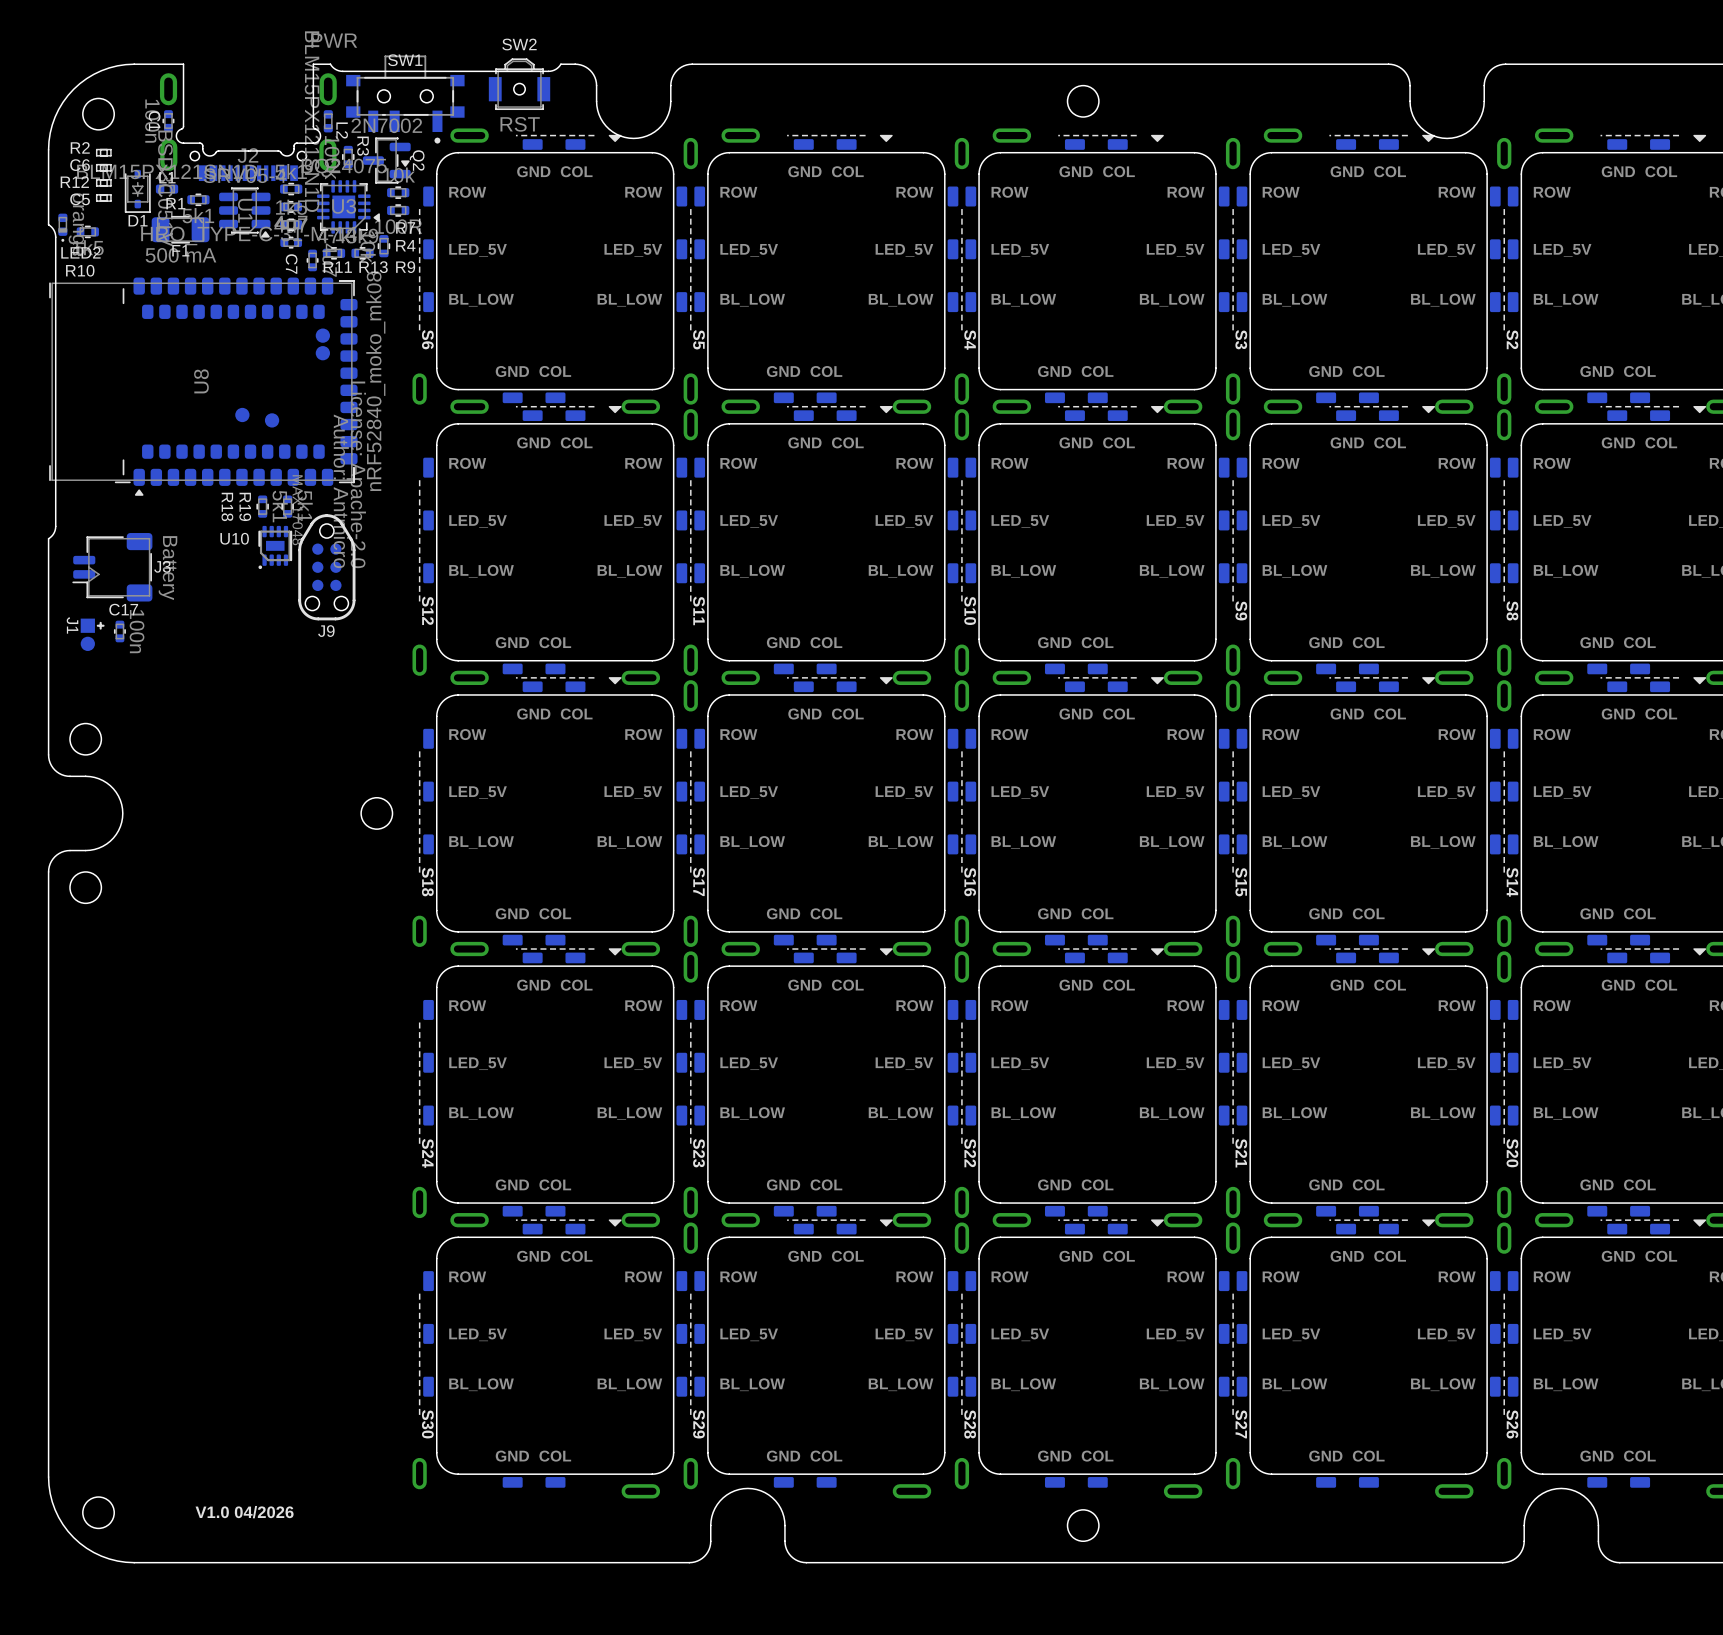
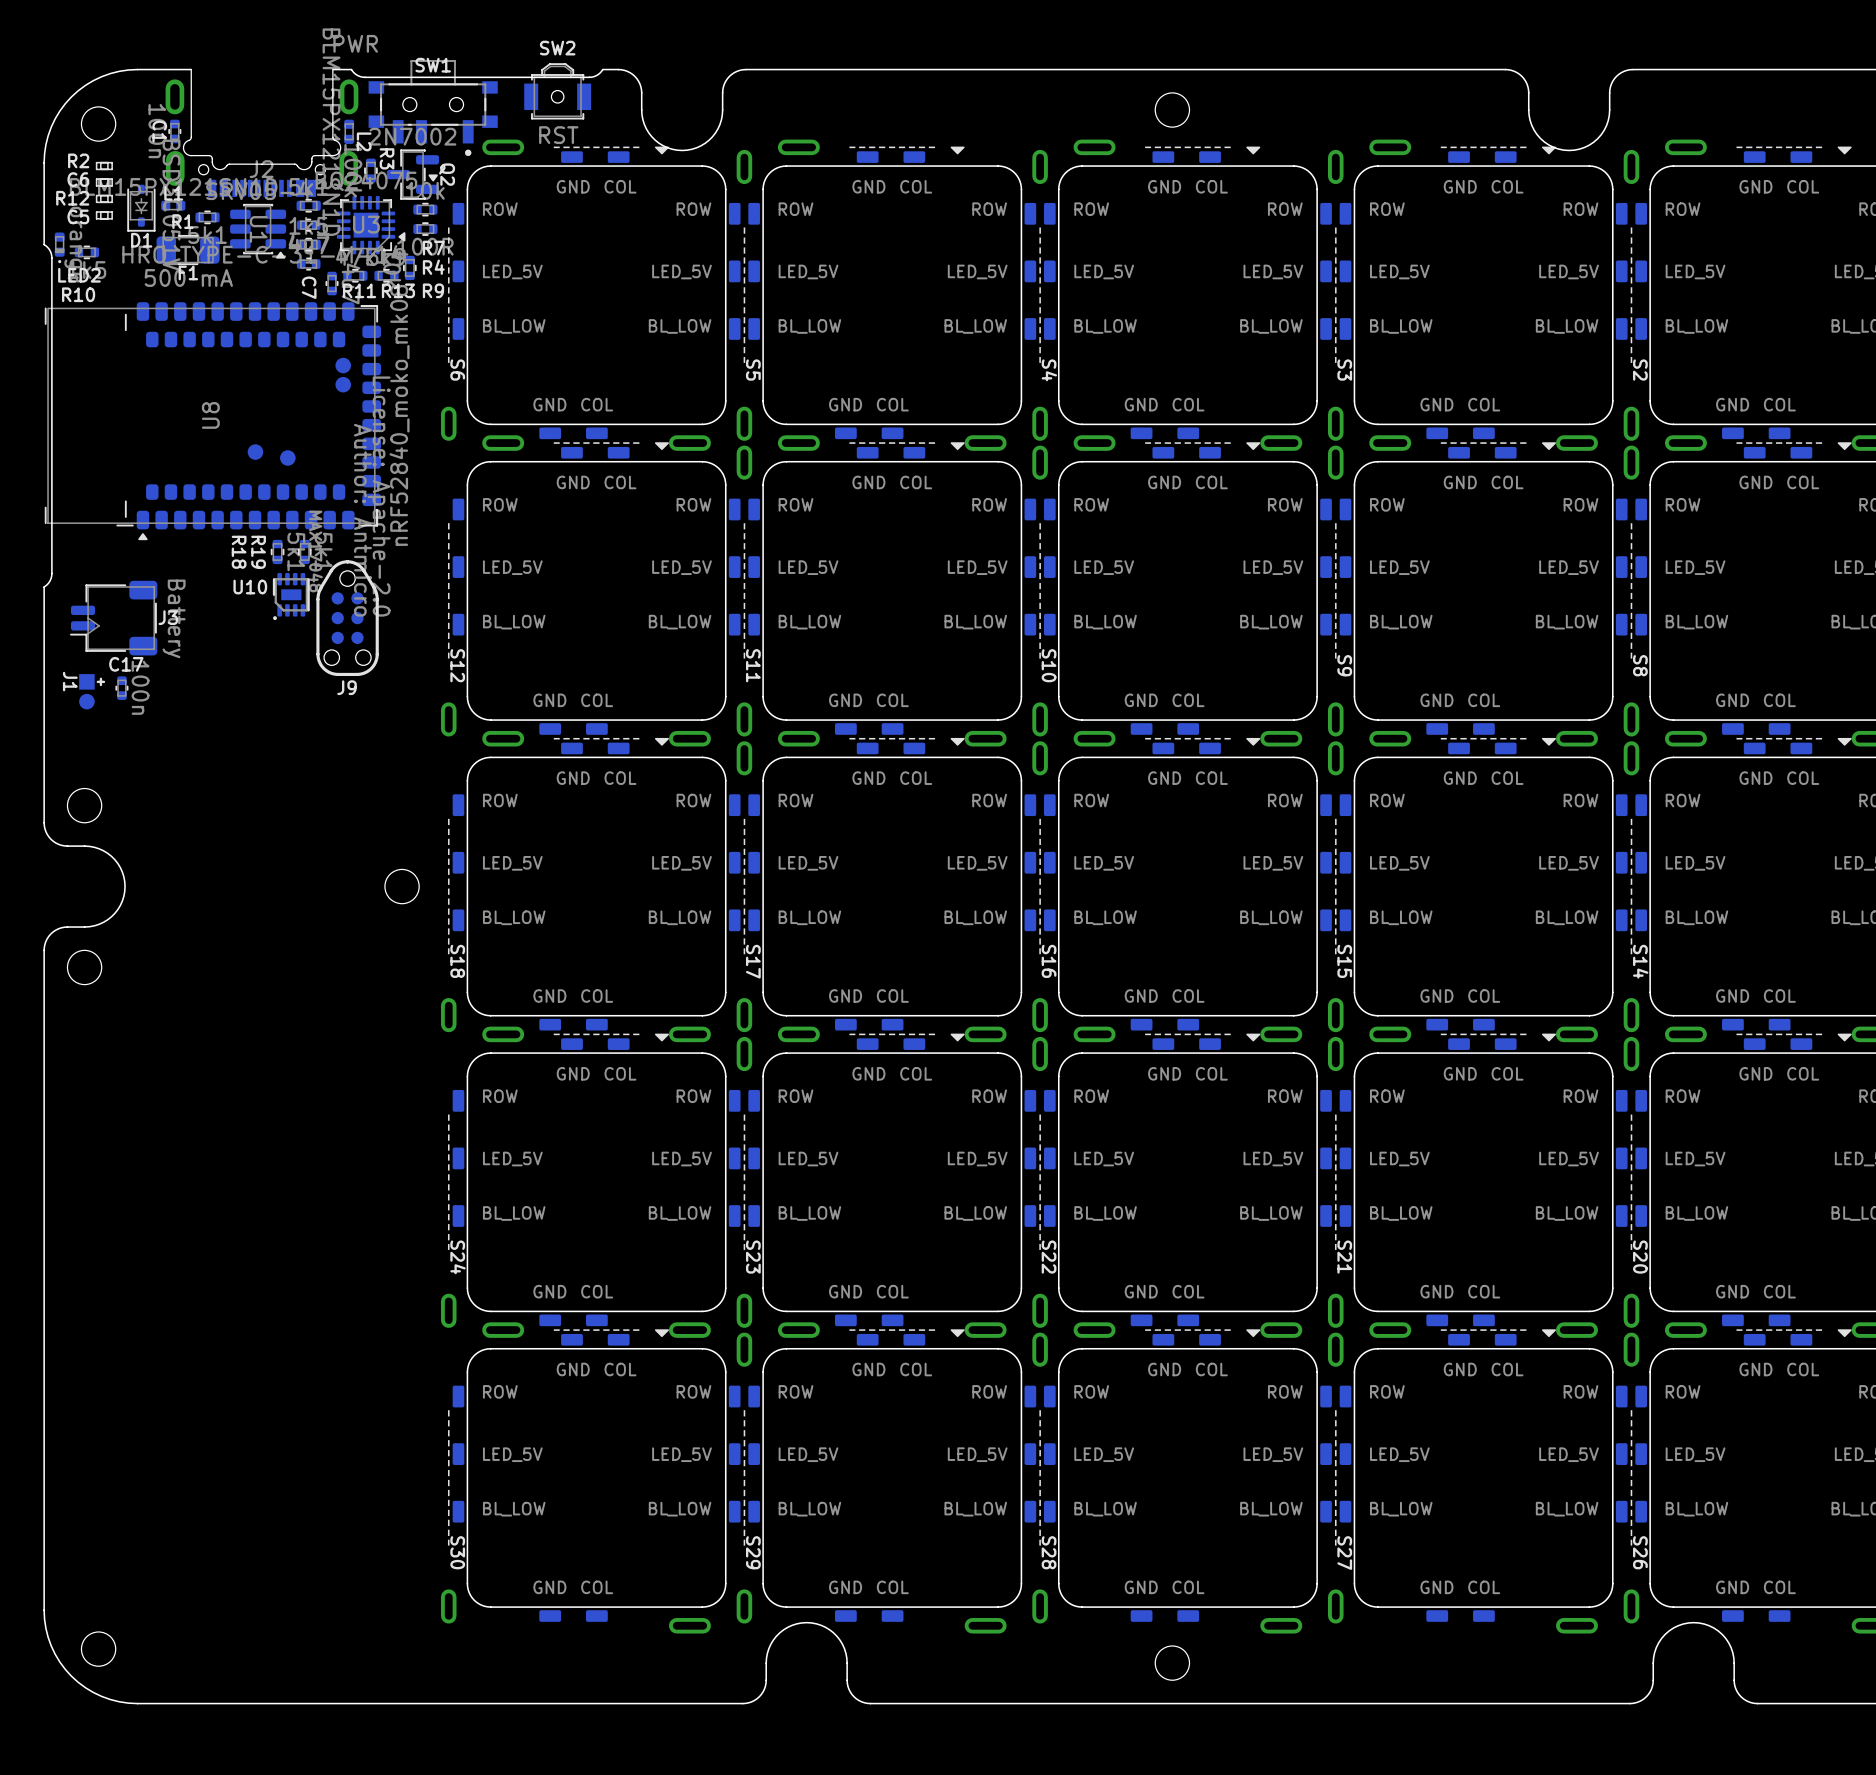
text: V1.0 04/2026 (244, 1512) -> none

